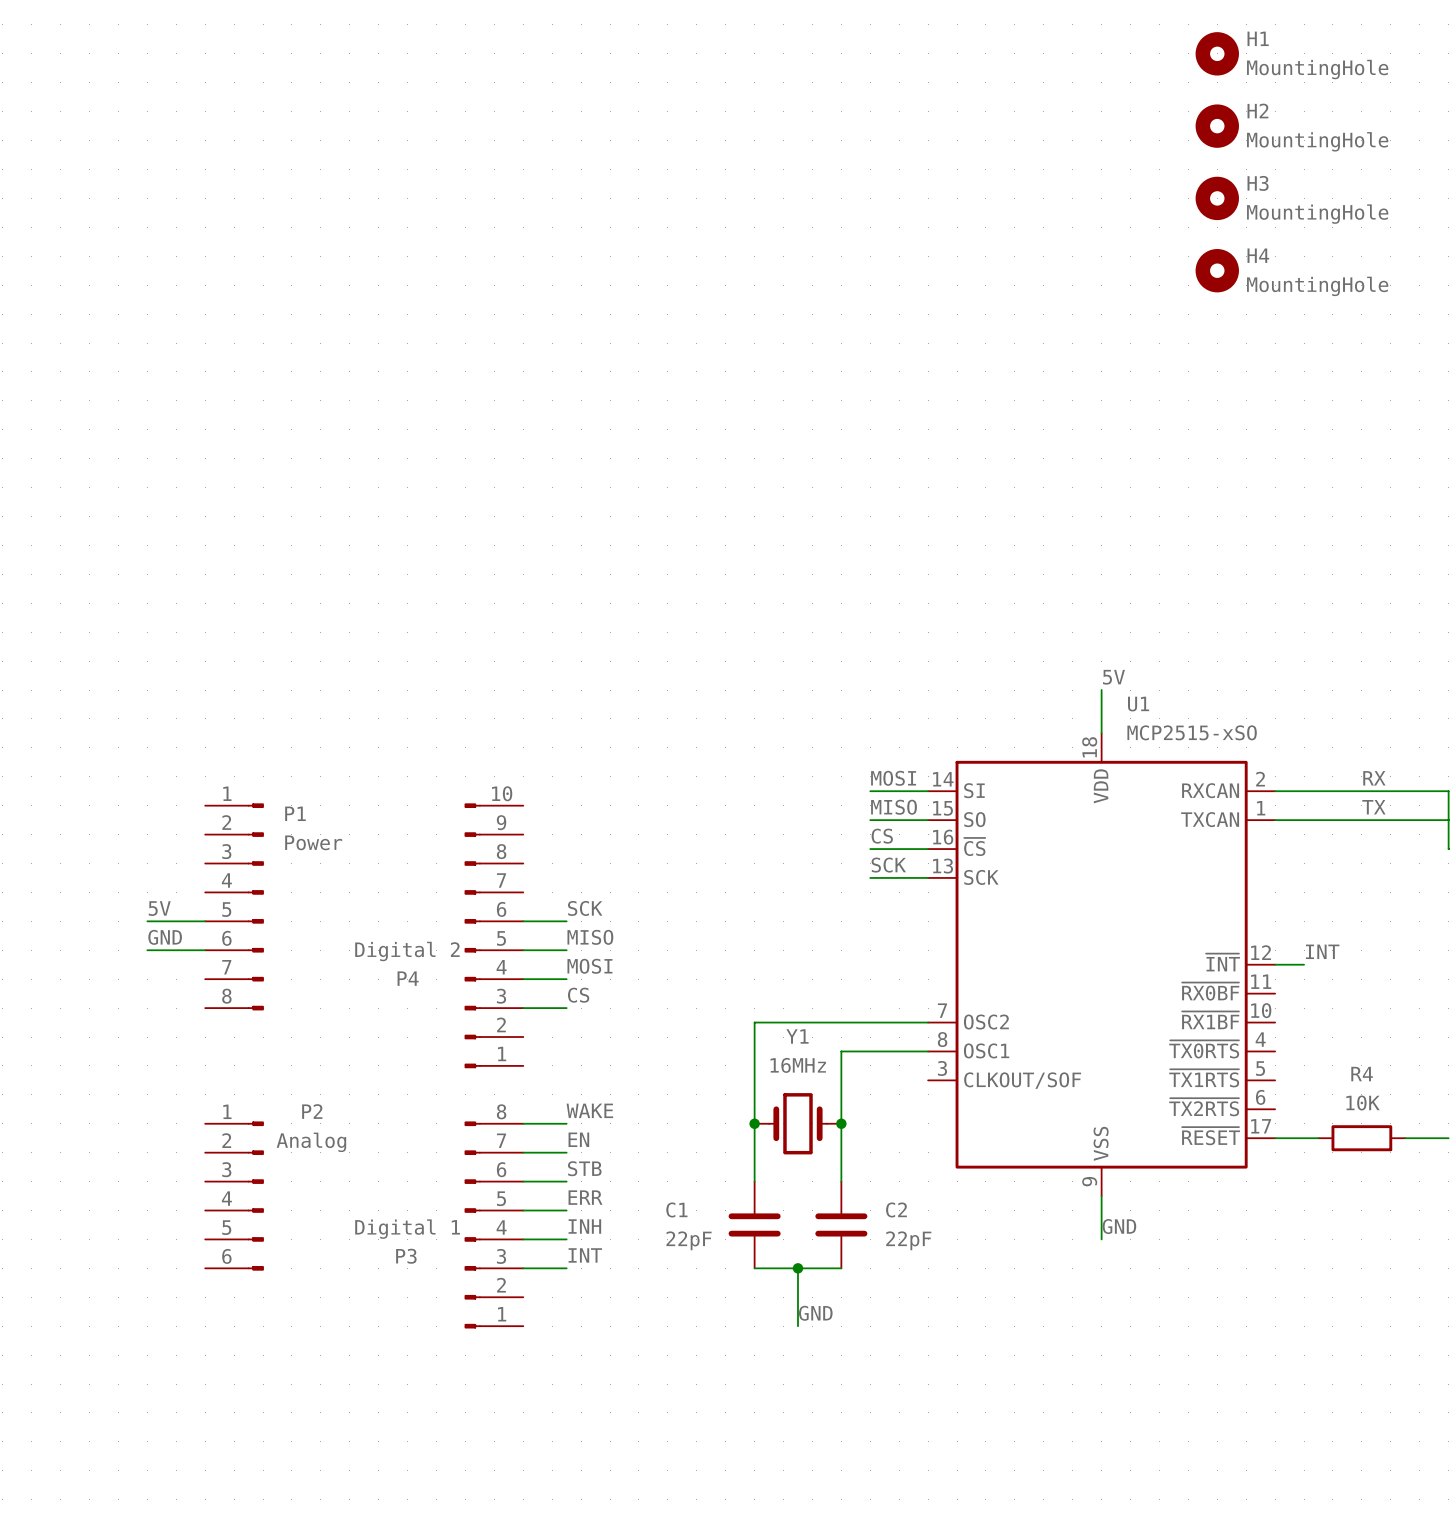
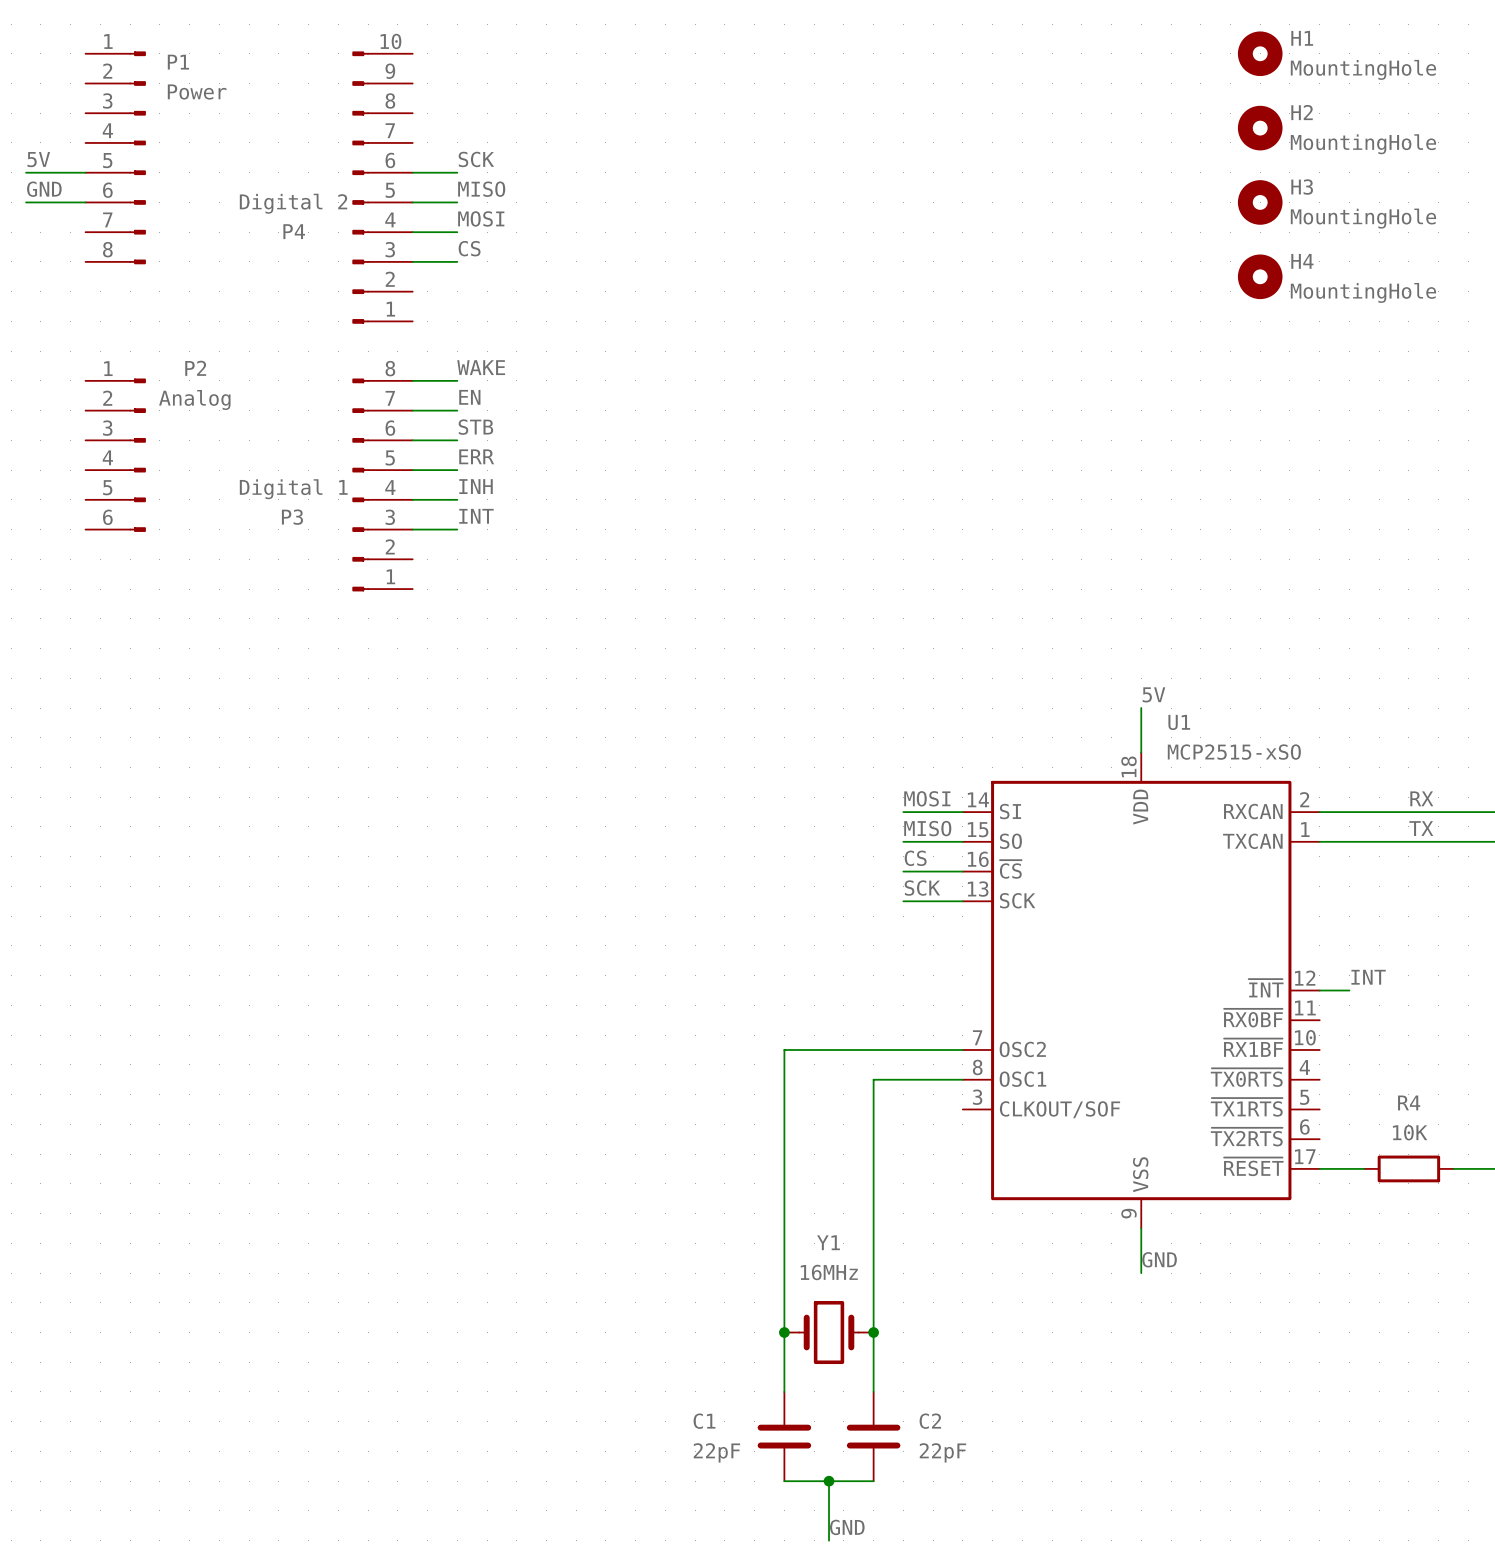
label: none -> 5V (38, 159)
label: none -> SCK (476, 159)
wire: none -> (26, 172) (85, 172)
wire: none -> (412, 172) (457, 172)
label: none -> GND (44, 189)
label: none -> MISO (481, 189)
wire: none -> (26, 202) (85, 202)
wire: none -> (412, 202) (457, 202)
label: none -> MOSI (481, 218)
wire: none -> (412, 232) (457, 232)
label: none -> CS (469, 248)
wire: none -> (412, 261) (457, 261)
label: none -> WAKE (481, 367)
wire: none -> (412, 380) (457, 380)
label: none -> EN (469, 397)
wire: none -> (412, 410) (457, 410)
label: none -> STB (475, 427)
wire: none -> (412, 440) (457, 440)
label: none -> ERR (476, 456)
wire: none -> (412, 470) (457, 470)
label: none -> INH (476, 486)
wire: none -> (412, 499) (457, 499)
label: none -> INT (476, 516)
wire: none -> (412, 529) (457, 529)
P1 position: (234, 906) -> (115, 157)
label: 5V (159, 908) -> none
label: SCK (585, 908) -> none
wire: (147, 921) (205, 921) -> none
wire: (523, 921) (566, 921) -> none
P4 position: (493, 935) -> (382, 187)
label: GND (165, 937) -> none
label: MISO (590, 937) -> none
wire: (147, 950) (205, 950) -> none
wire: (523, 950) (566, 950) -> none
label: MOSI (589, 966) -> none
wire: (523, 979) (566, 979) -> none
label: CS (578, 995) -> none
wire: (523, 1008) (566, 1008) -> none
label: WAKE (589, 1110) -> none
wire: (523, 1123) (566, 1123) -> none
junction: (754, 1123) -> none
Y1 position: (797, 1123) -> (829, 1332)
junction: (841, 1123) -> none
label: EN (578, 1139) -> none
wire: (523, 1152) (566, 1152) -> none
label: STB (584, 1168) -> none
wire: (523, 1181) (566, 1181) -> none
wire: none -> (784, 1213) (784, 1391)
wire: none -> (873, 1213) (873, 1391)
P2 position: (234, 1196) -> (115, 455)
label: ERR (585, 1197) -> none
wire: (523, 1210) (566, 1210) -> none
P3 position: (493, 1224) -> (382, 484)
C1 position: (754, 1224) -> (784, 1436)
C2 position: (841, 1224) -> (873, 1436)
label: INH (584, 1226) -> none
wire: (523, 1239) (566, 1239) -> none
label: INT (585, 1255) -> none
wire: (523, 1268) (566, 1268) -> none
wire: (754, 1268) (841, 1268) -> (784, 1481) (873, 1481)
wire: (797, 1268) (797, 1326) -> (829, 1481) (829, 1540)
junction: (797, 1268) -> none
junction: none -> (784, 1332)
junction: none -> (873, 1332)
label position: GND (815, 1313) -> GND (847, 1527)
junction: none -> (829, 1481)

